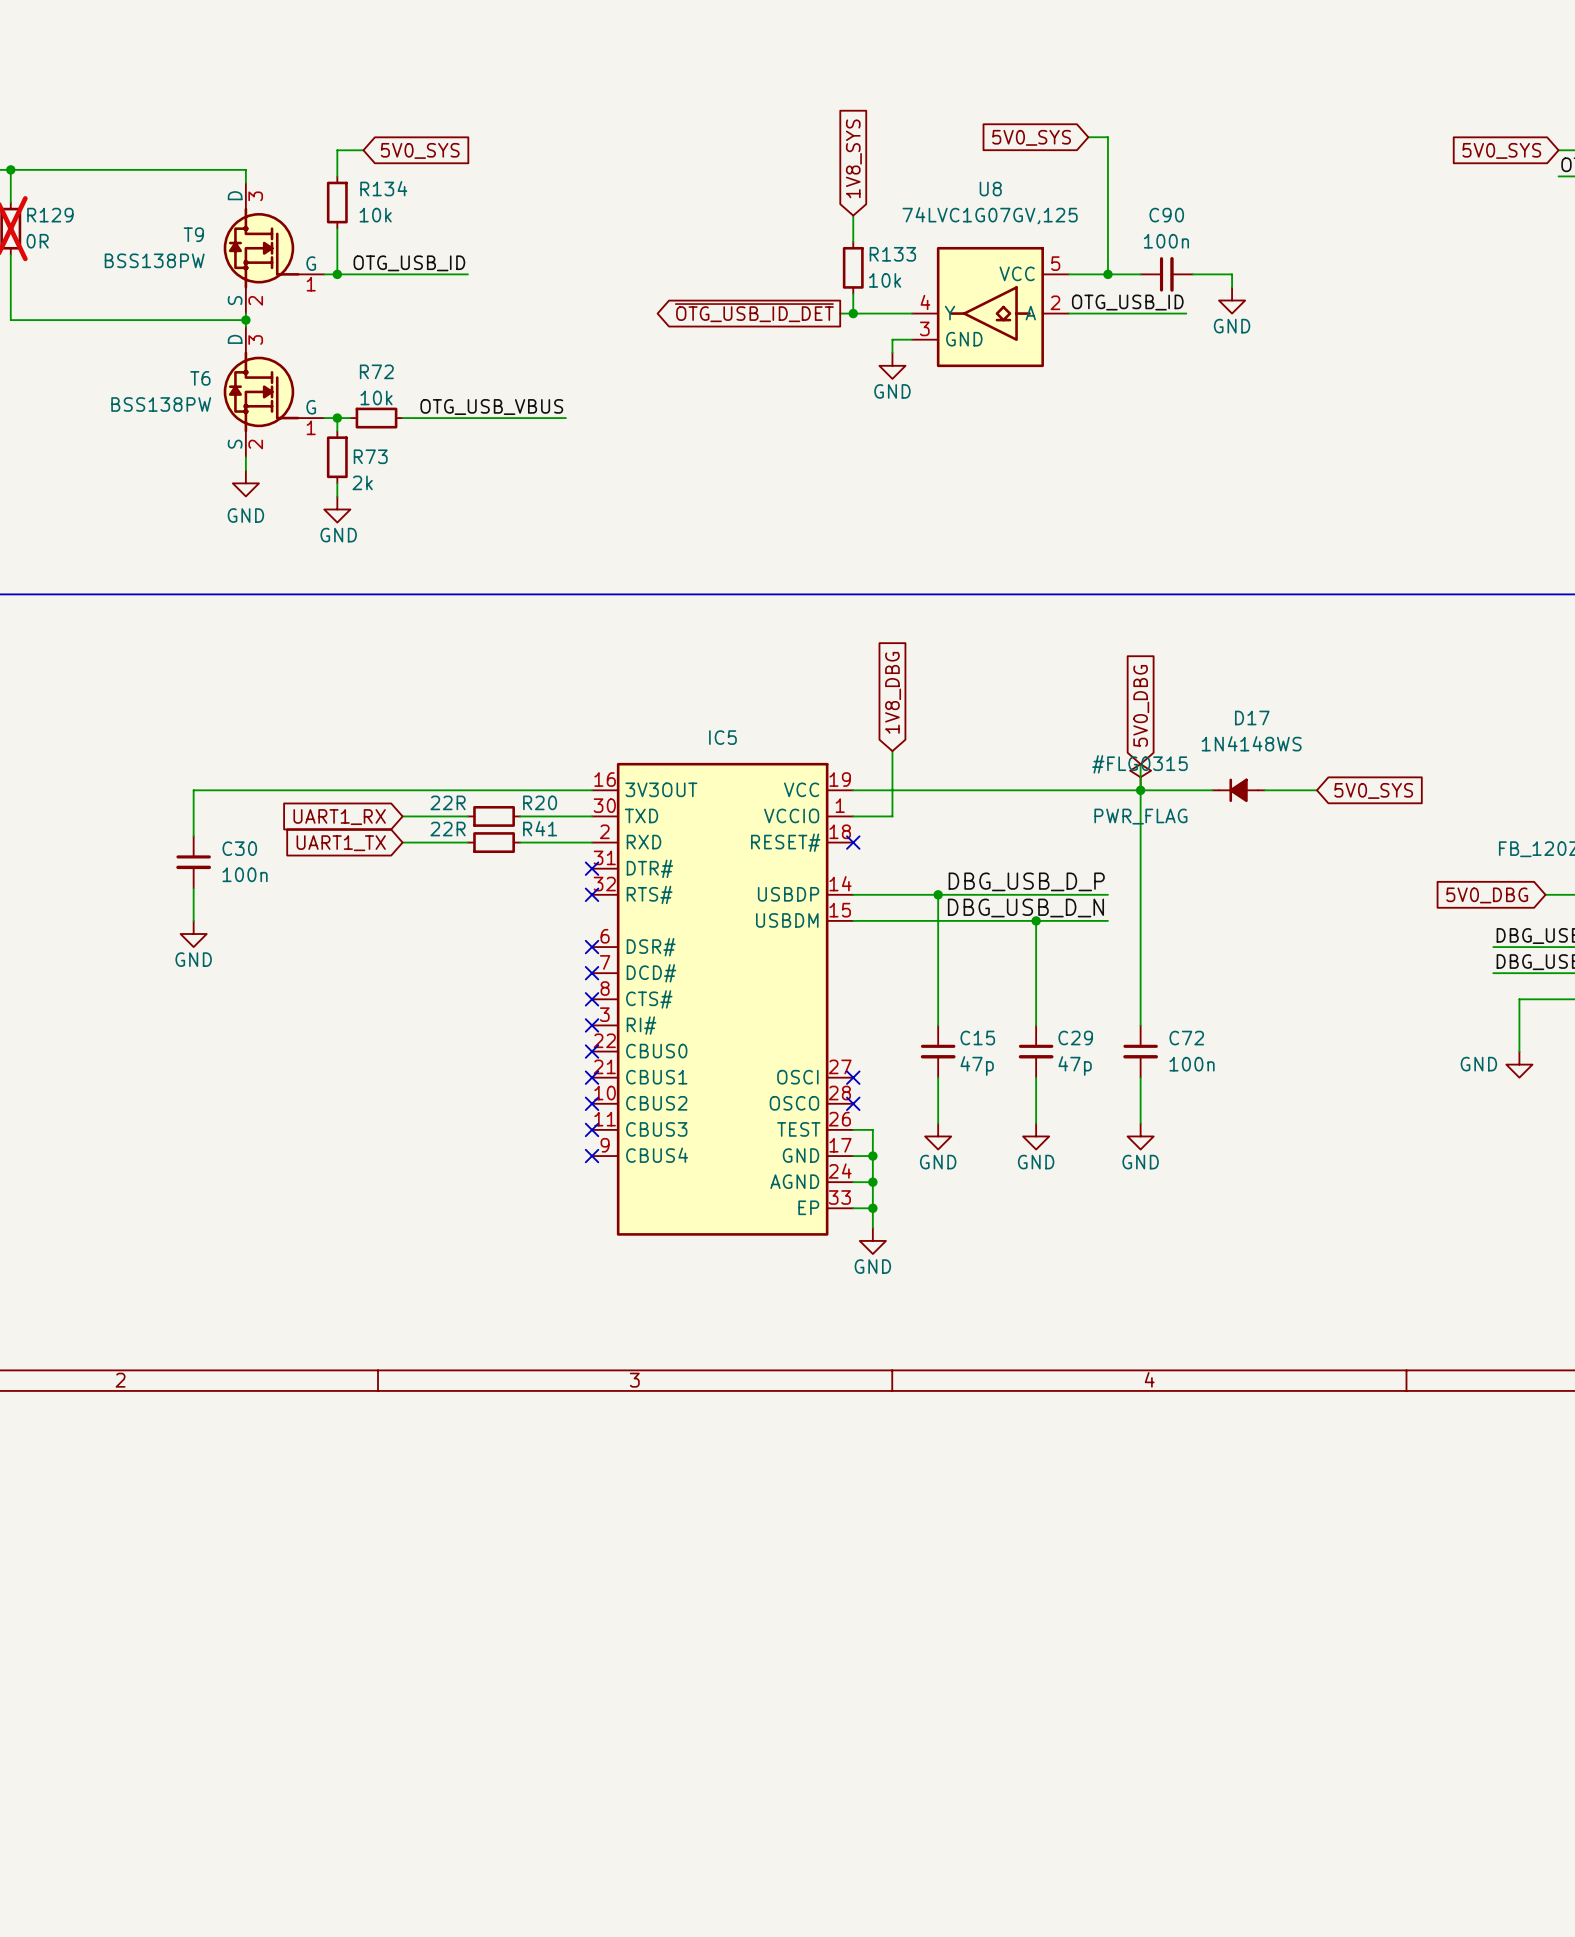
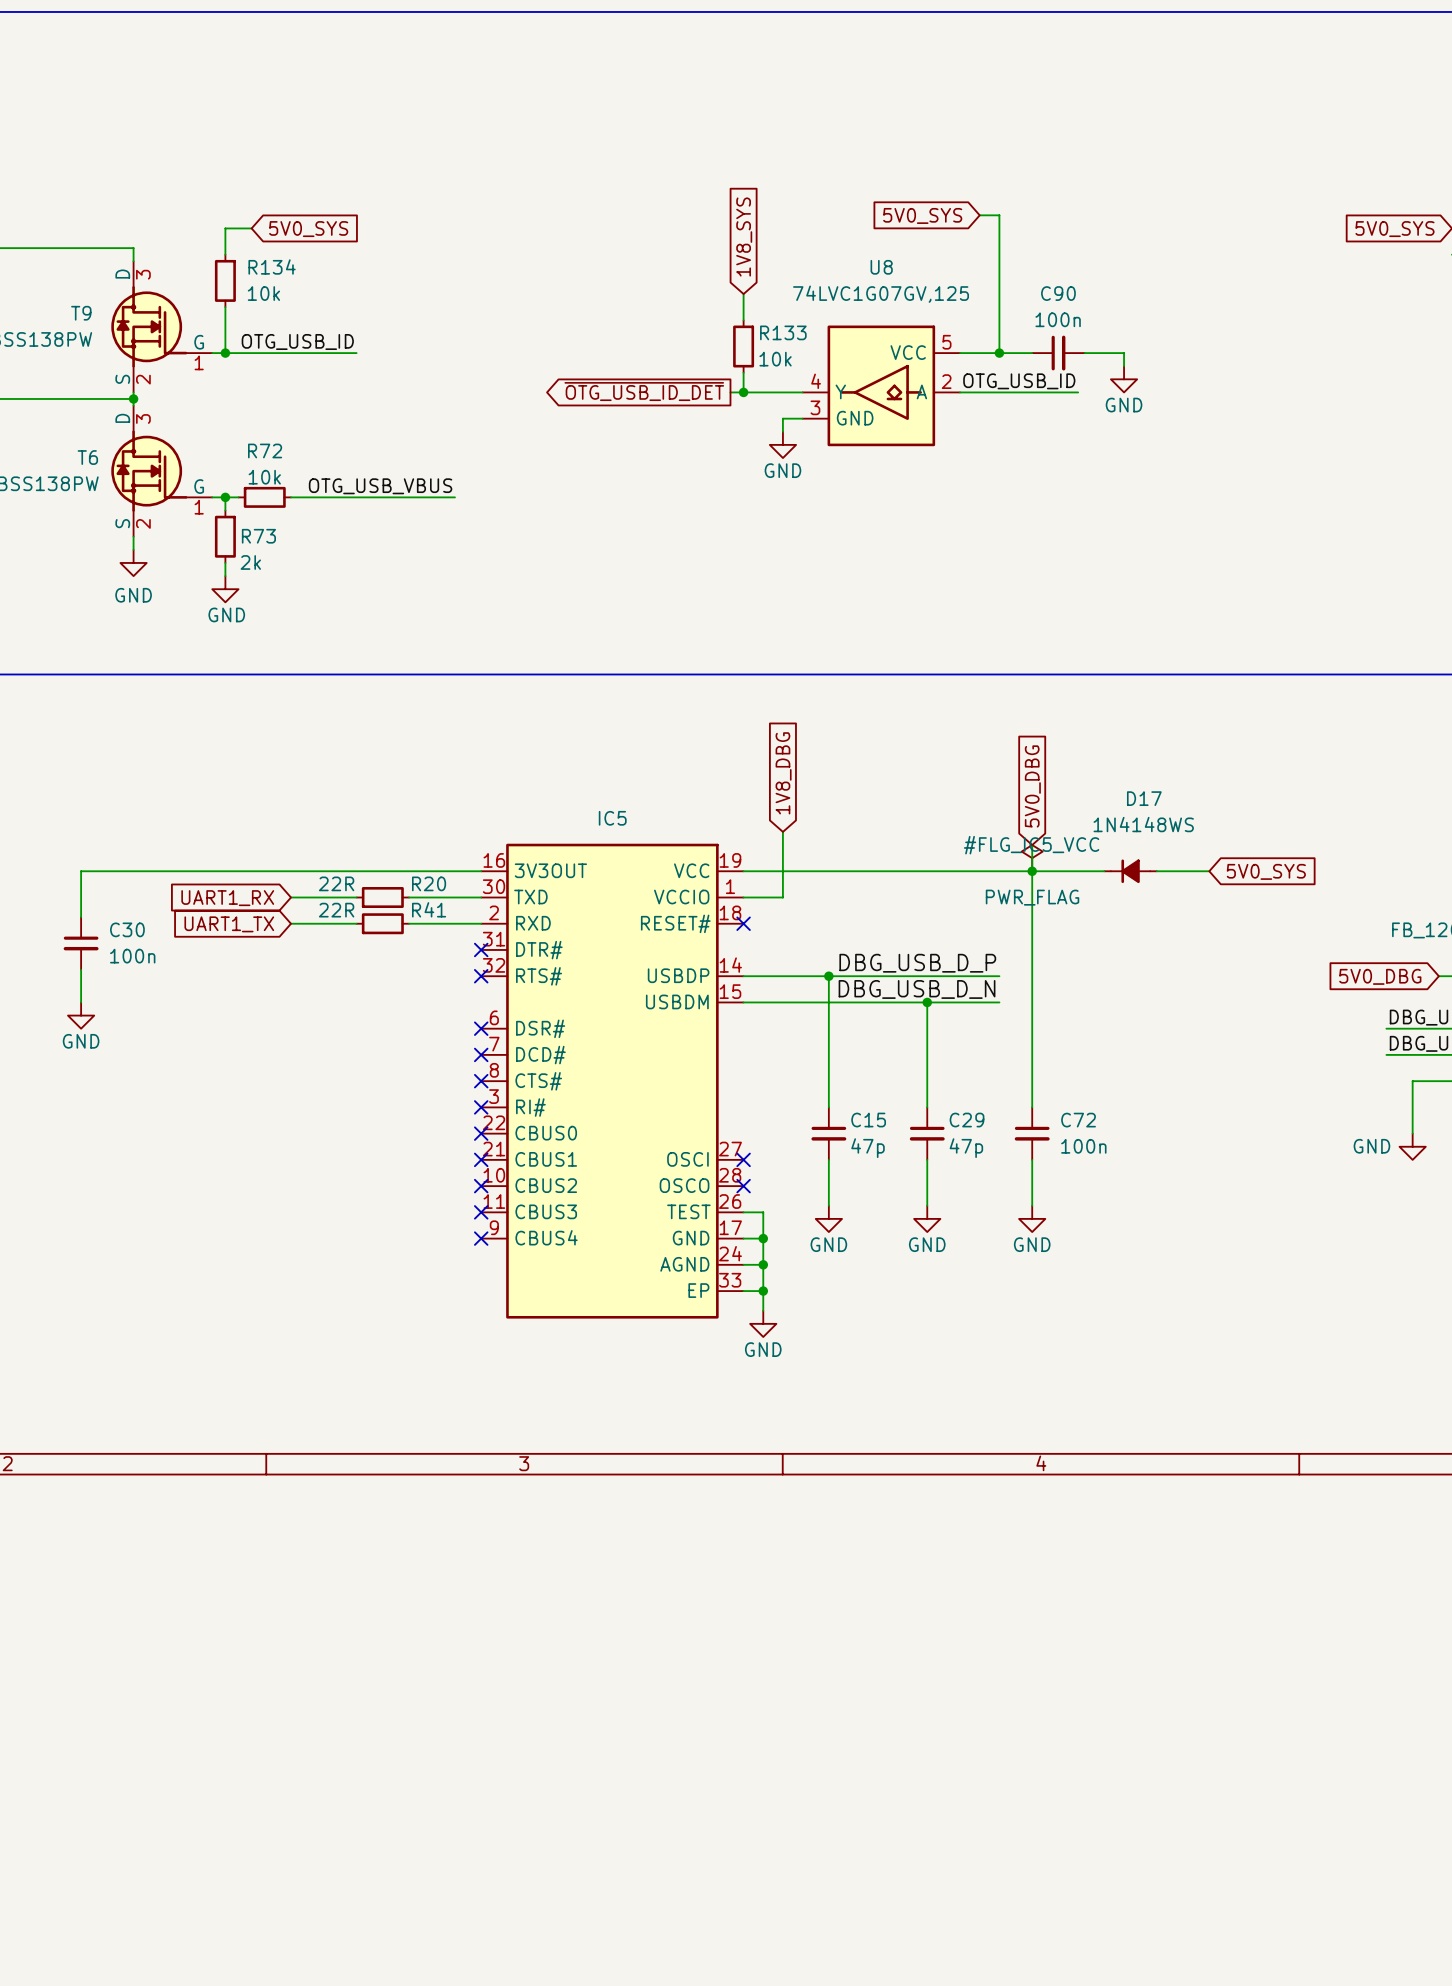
#FLG0315 name: #FLG0315 (1140, 764) -> #FLG_IC5_VCC (1031, 845)

